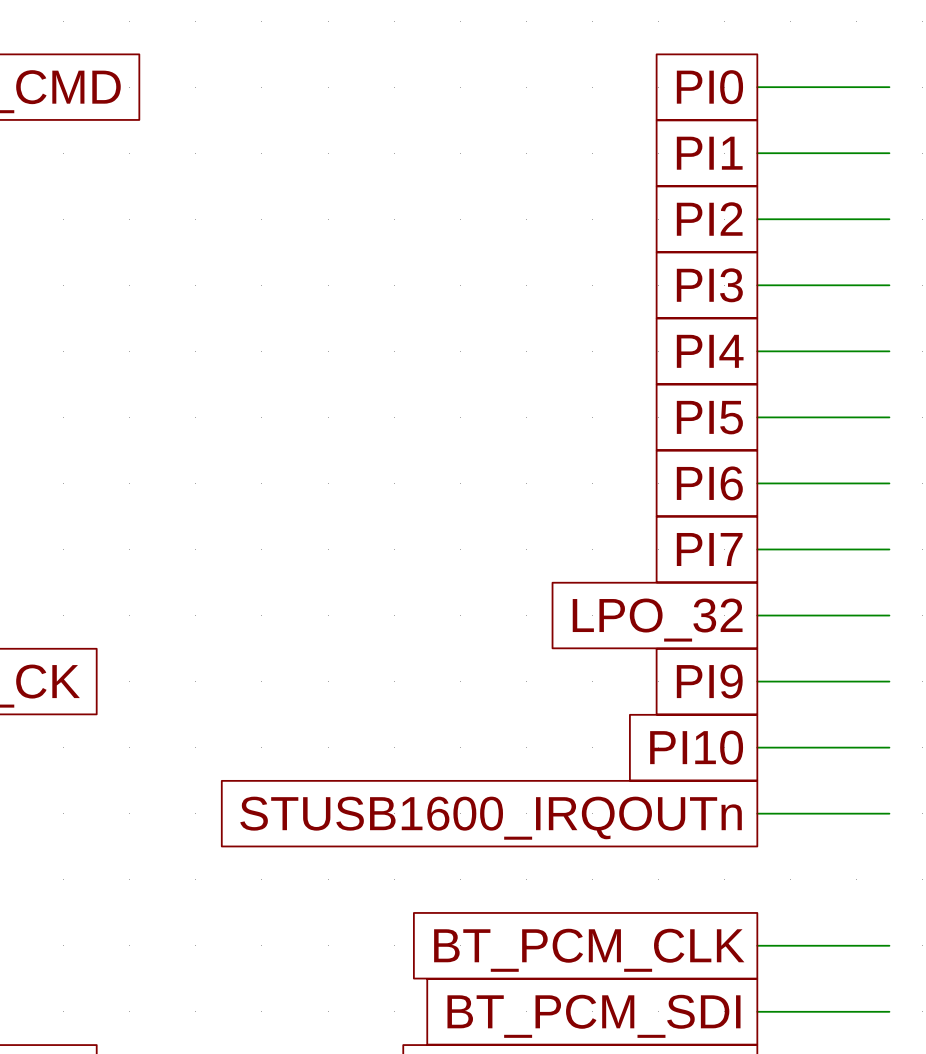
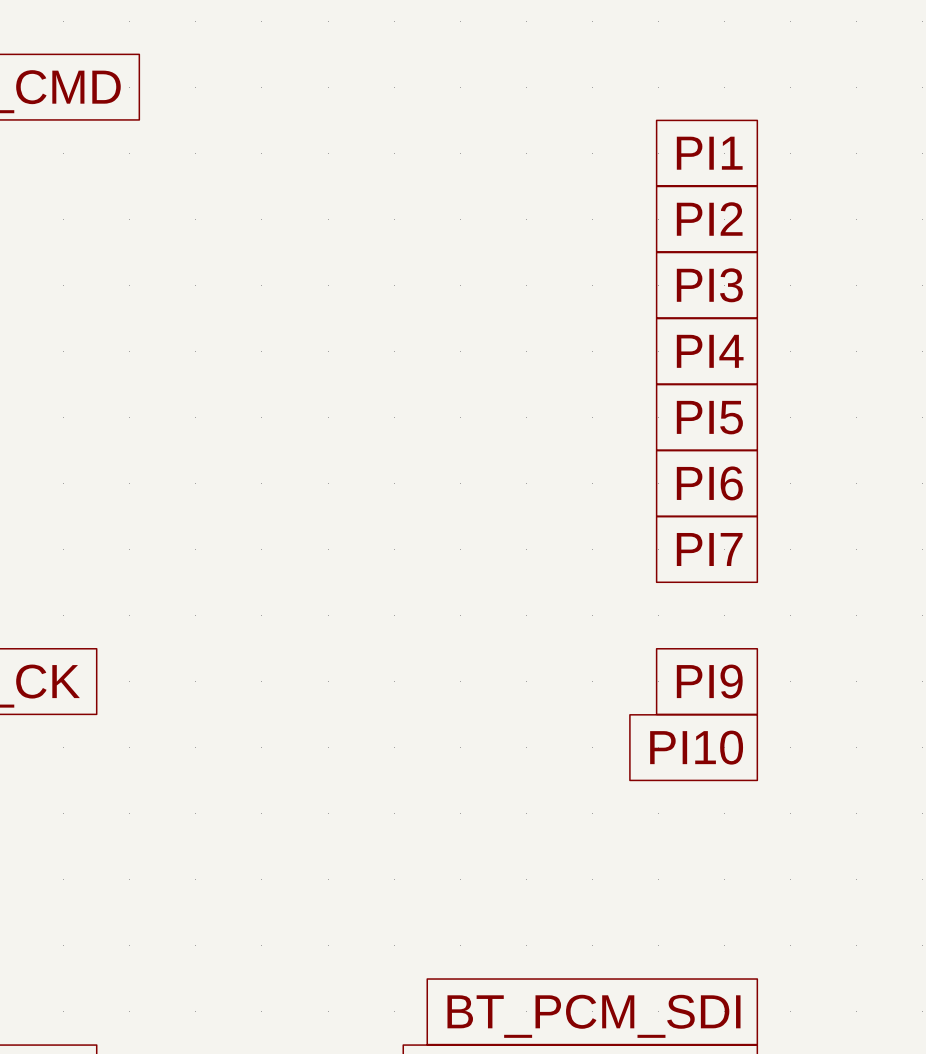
global label: PI0 (709, 87) -> none
wire: (757, 87) (889, 87) -> none
wire: (757, 153) (889, 153) -> none
wire: (757, 219) (889, 219) -> none
wire: (757, 285) (889, 285) -> none
wire: (757, 351) (889, 351) -> none
wire: (757, 417) (889, 417) -> none
wire: (757, 483) (889, 483) -> none
wire: (757, 549) (889, 549) -> none
wire: (757, 615) (889, 615) -> none
global label: LPO_32 (657, 620) -> none
wire: (757, 681) (889, 681) -> none
wire: (757, 747) (889, 747) -> none
wire: (757, 813) (889, 813) -> none
global label: STUSB1600_IRQOUTn (491, 818) -> none
wire: (757, 945) (889, 945) -> none
global label: BT_PCM_CLK (589, 950) -> none
wire: (757, 1011) (889, 1011) -> none

